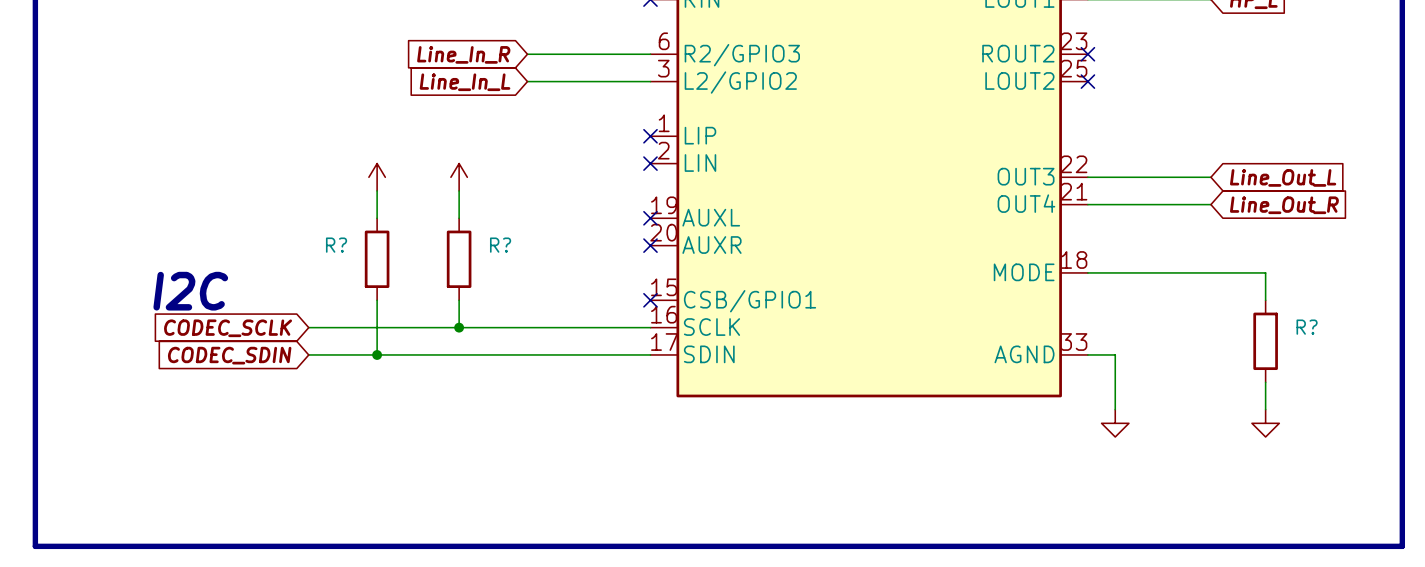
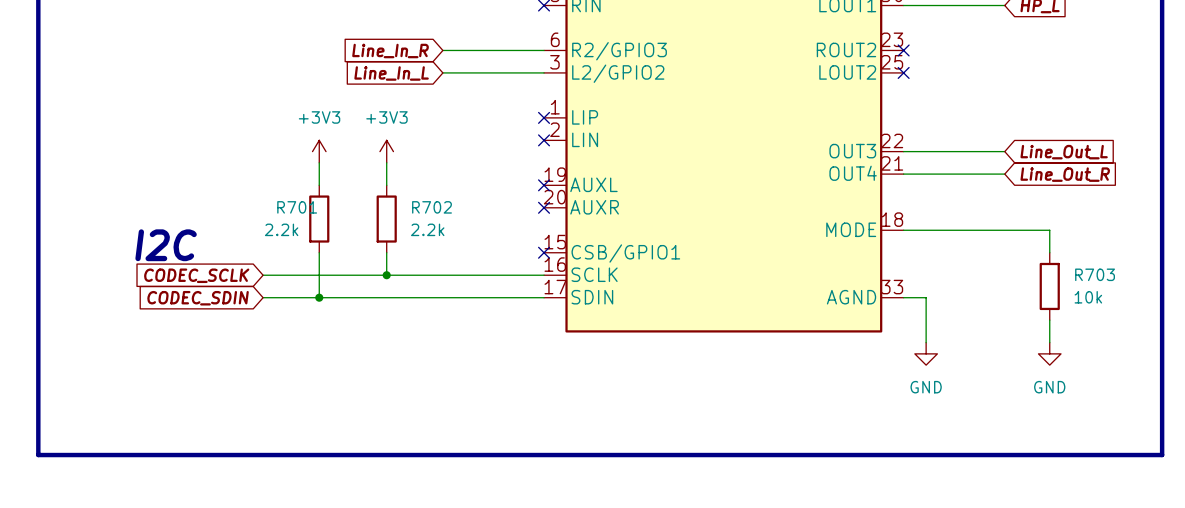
power symbol text: none -> +3V3 (319, 117)
power symbol text: none -> +3V3 (386, 117)
R? name: R? (336, 245) -> R701 (297, 207)
R? name: R? (500, 245) -> R702 (432, 207)
R? value: none -> 2.2k (281, 229)
R? value: none -> 2.2k (427, 229)
R? name: R? (1307, 327) -> R703 (1095, 274)
R? value: none -> 10k (1088, 297)
power symbol text: none -> GND (926, 387)
power symbol text: none -> GND (1049, 387)

